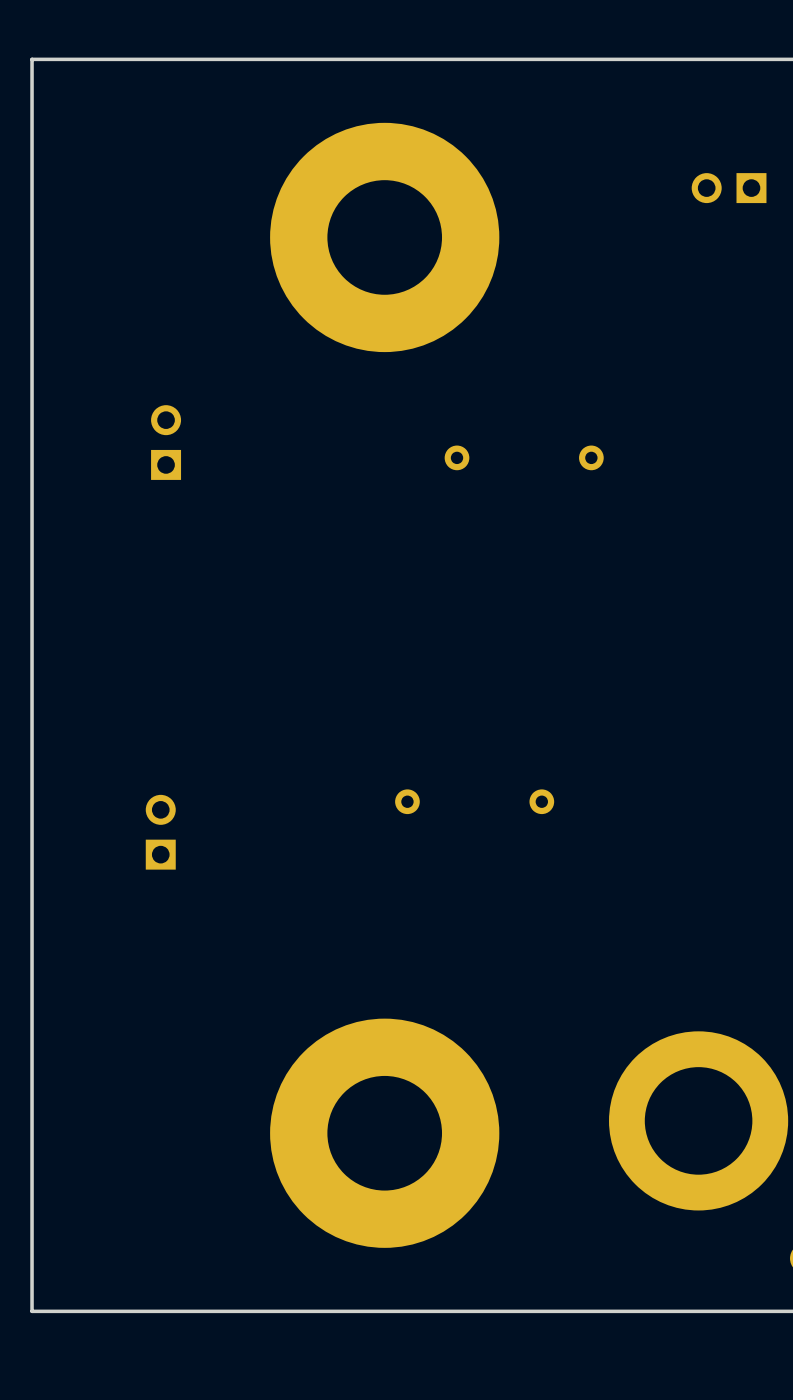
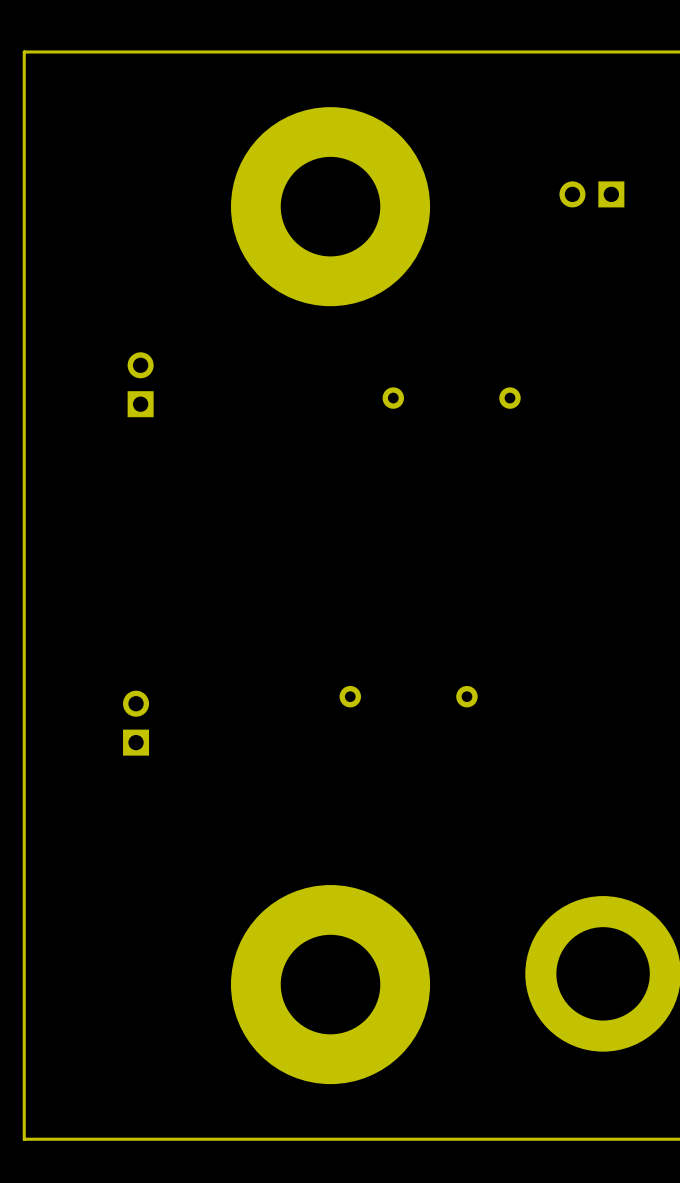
part position: (729, 188) -> (591, 194)

